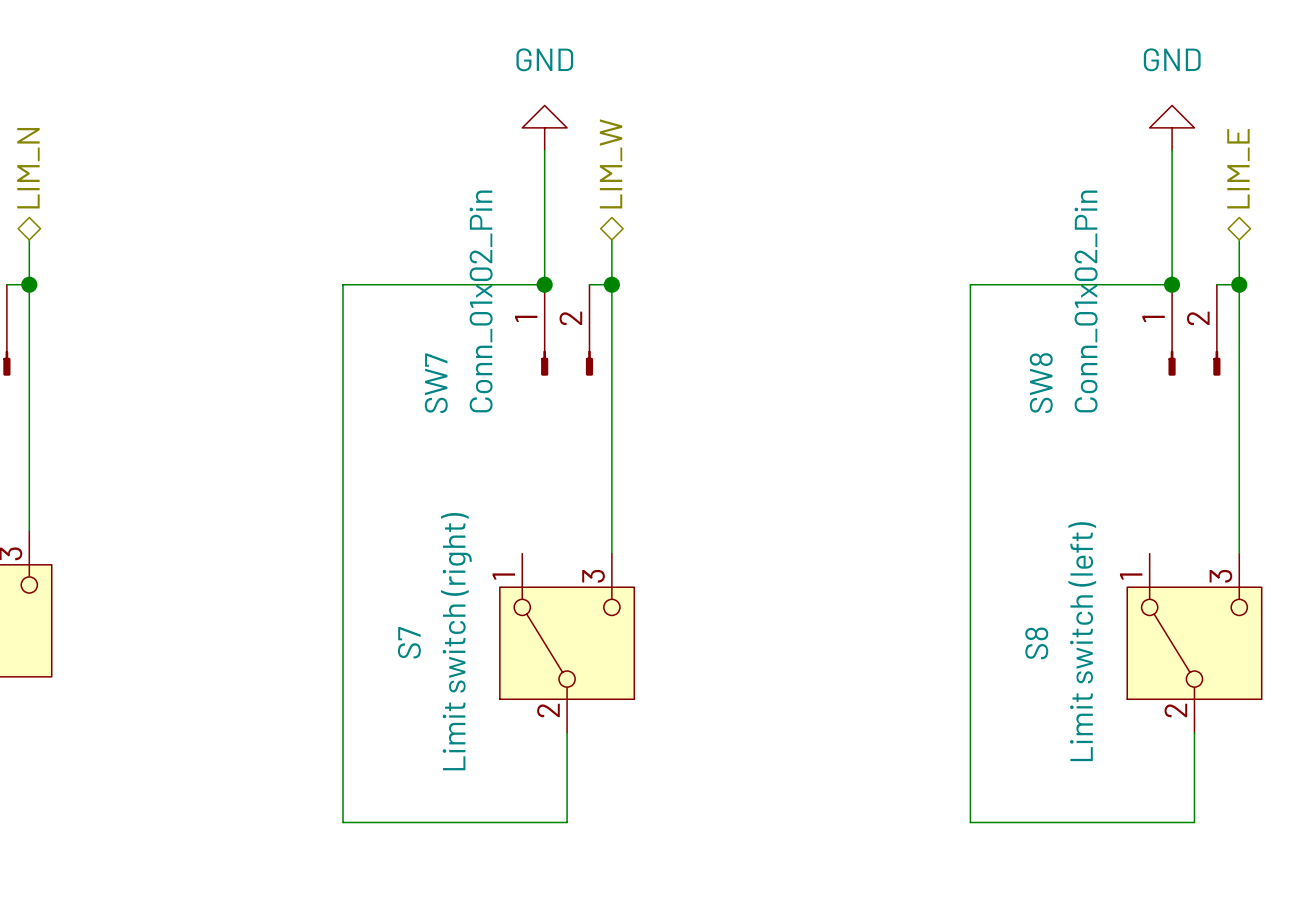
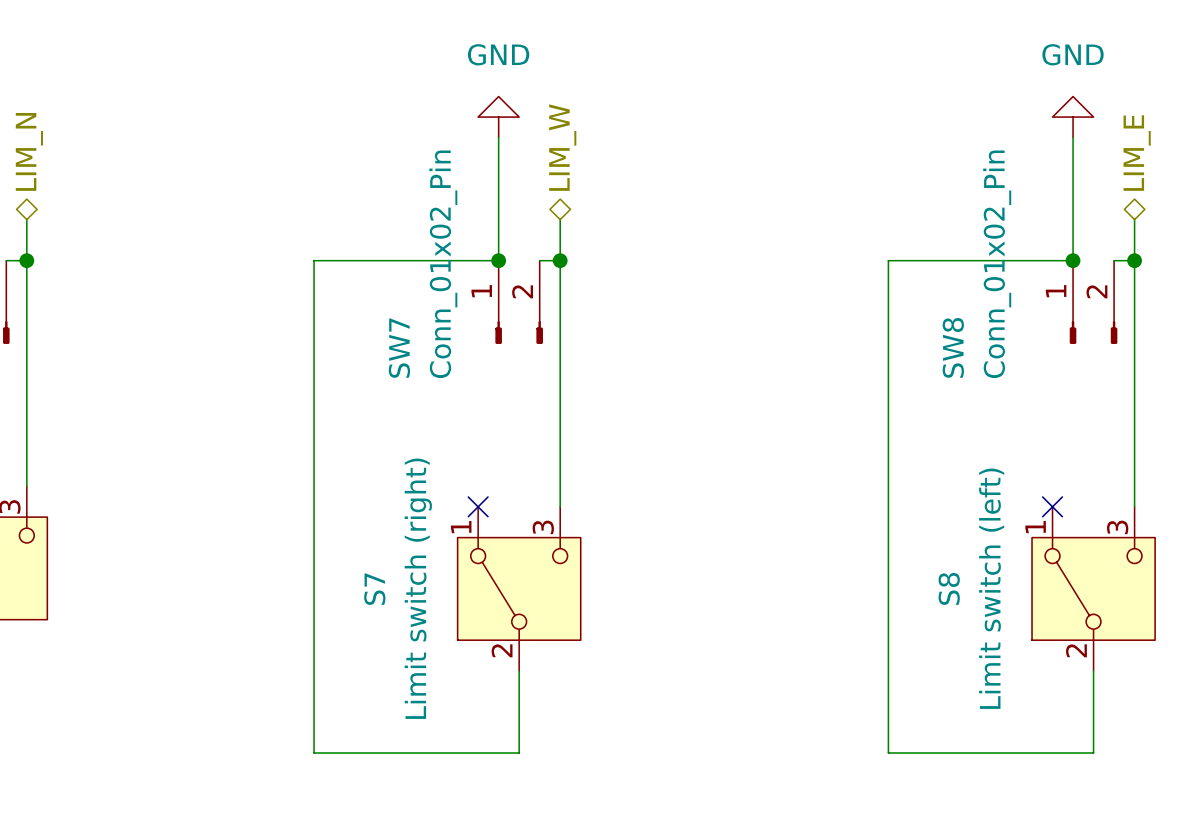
no-connect mark: none -> (478, 506)
no-connect mark: none -> (1052, 506)

